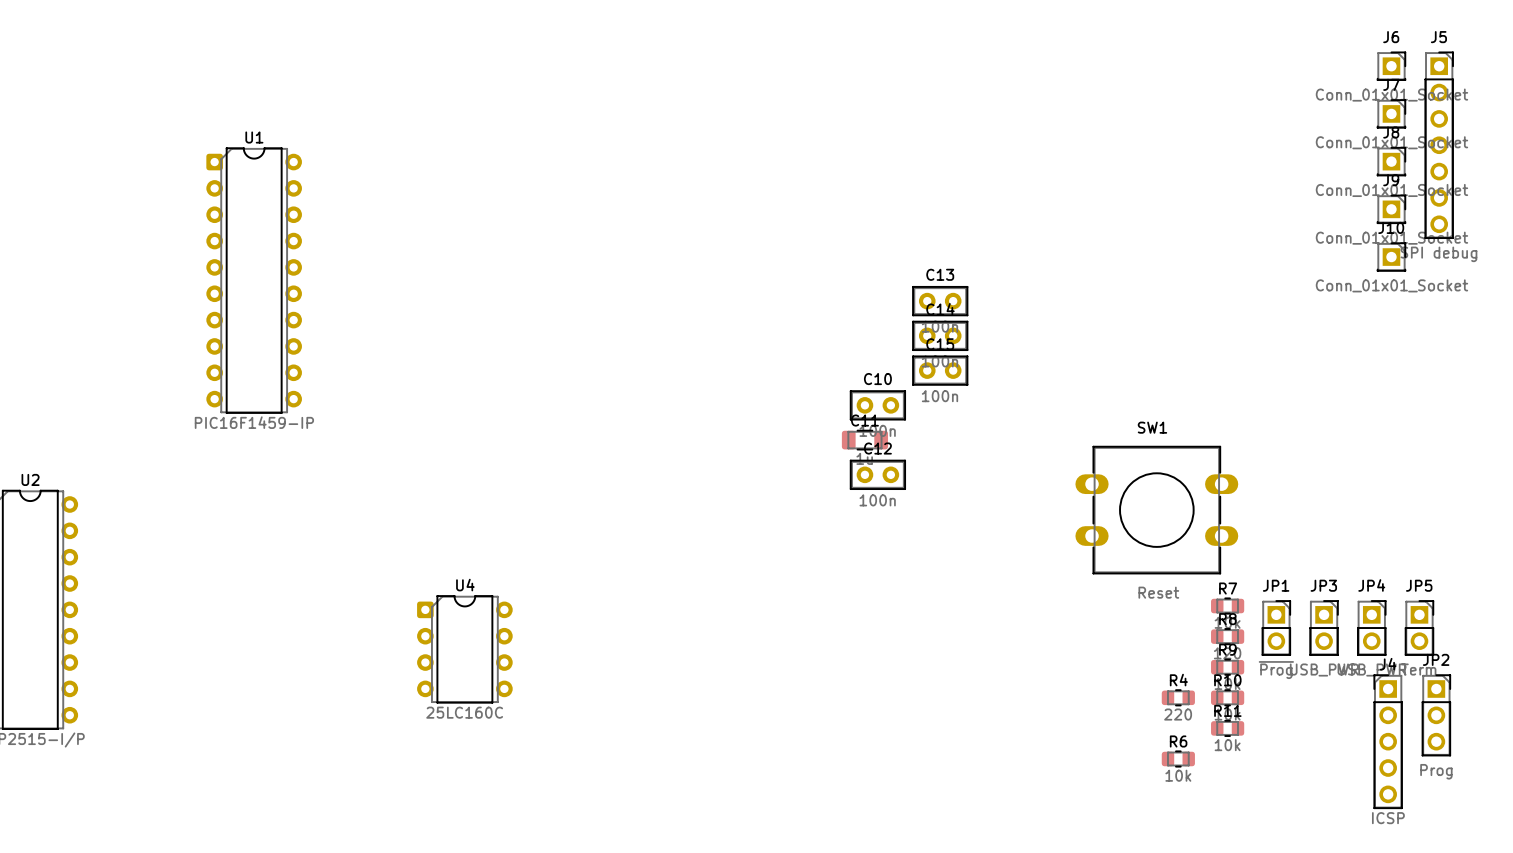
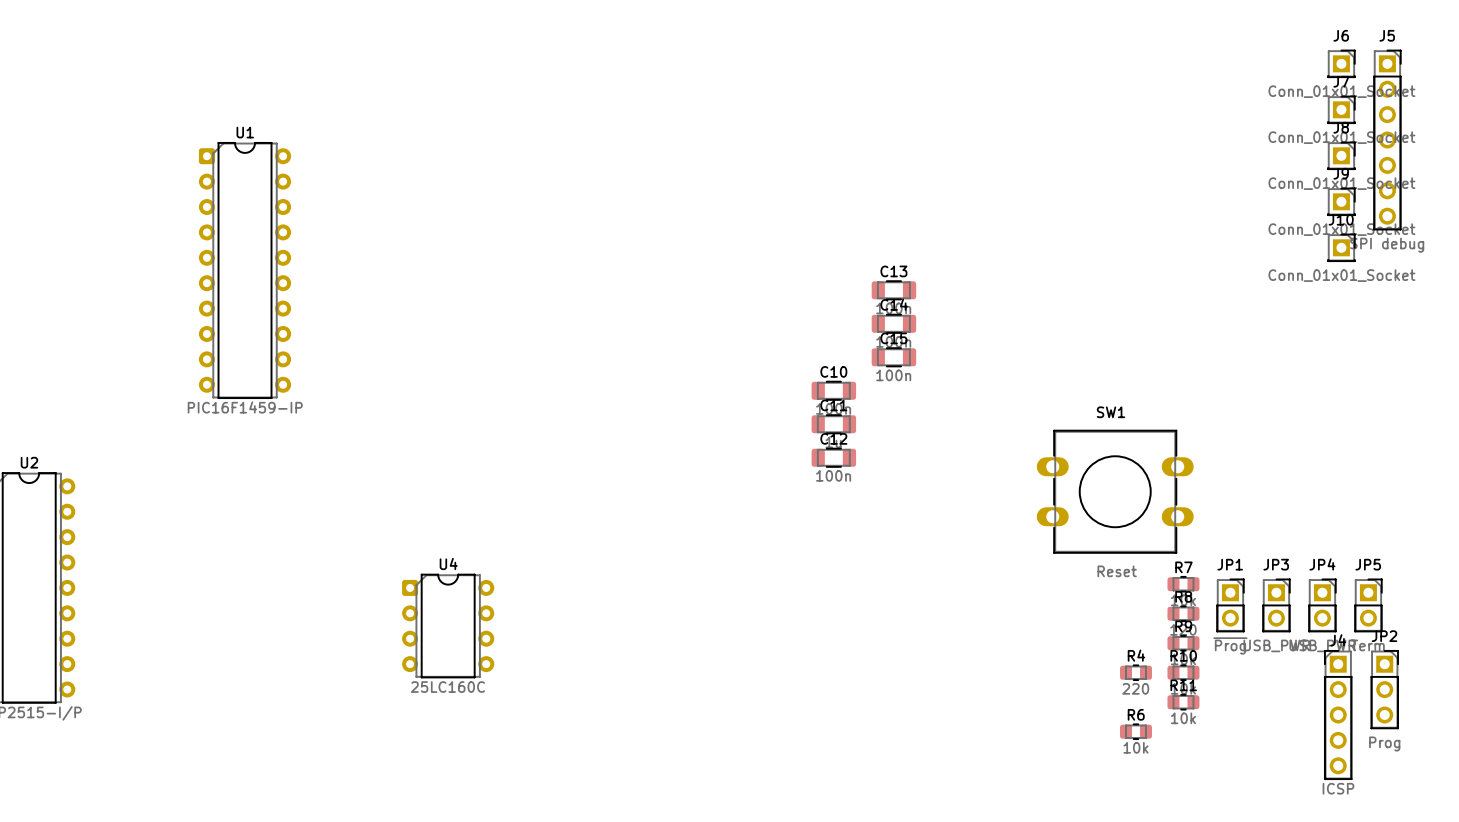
C13 footprint: [912, 286, 969, 316] -> [871, 280, 917, 300]
C14 footprint: [912, 321, 969, 351] -> [871, 314, 917, 334]
C15 footprint: [912, 355, 969, 386] -> [871, 347, 917, 367]
C10 footprint: [850, 390, 906, 421] -> [811, 381, 857, 401]
C12 footprint: [850, 460, 906, 490] -> [811, 448, 857, 468]

